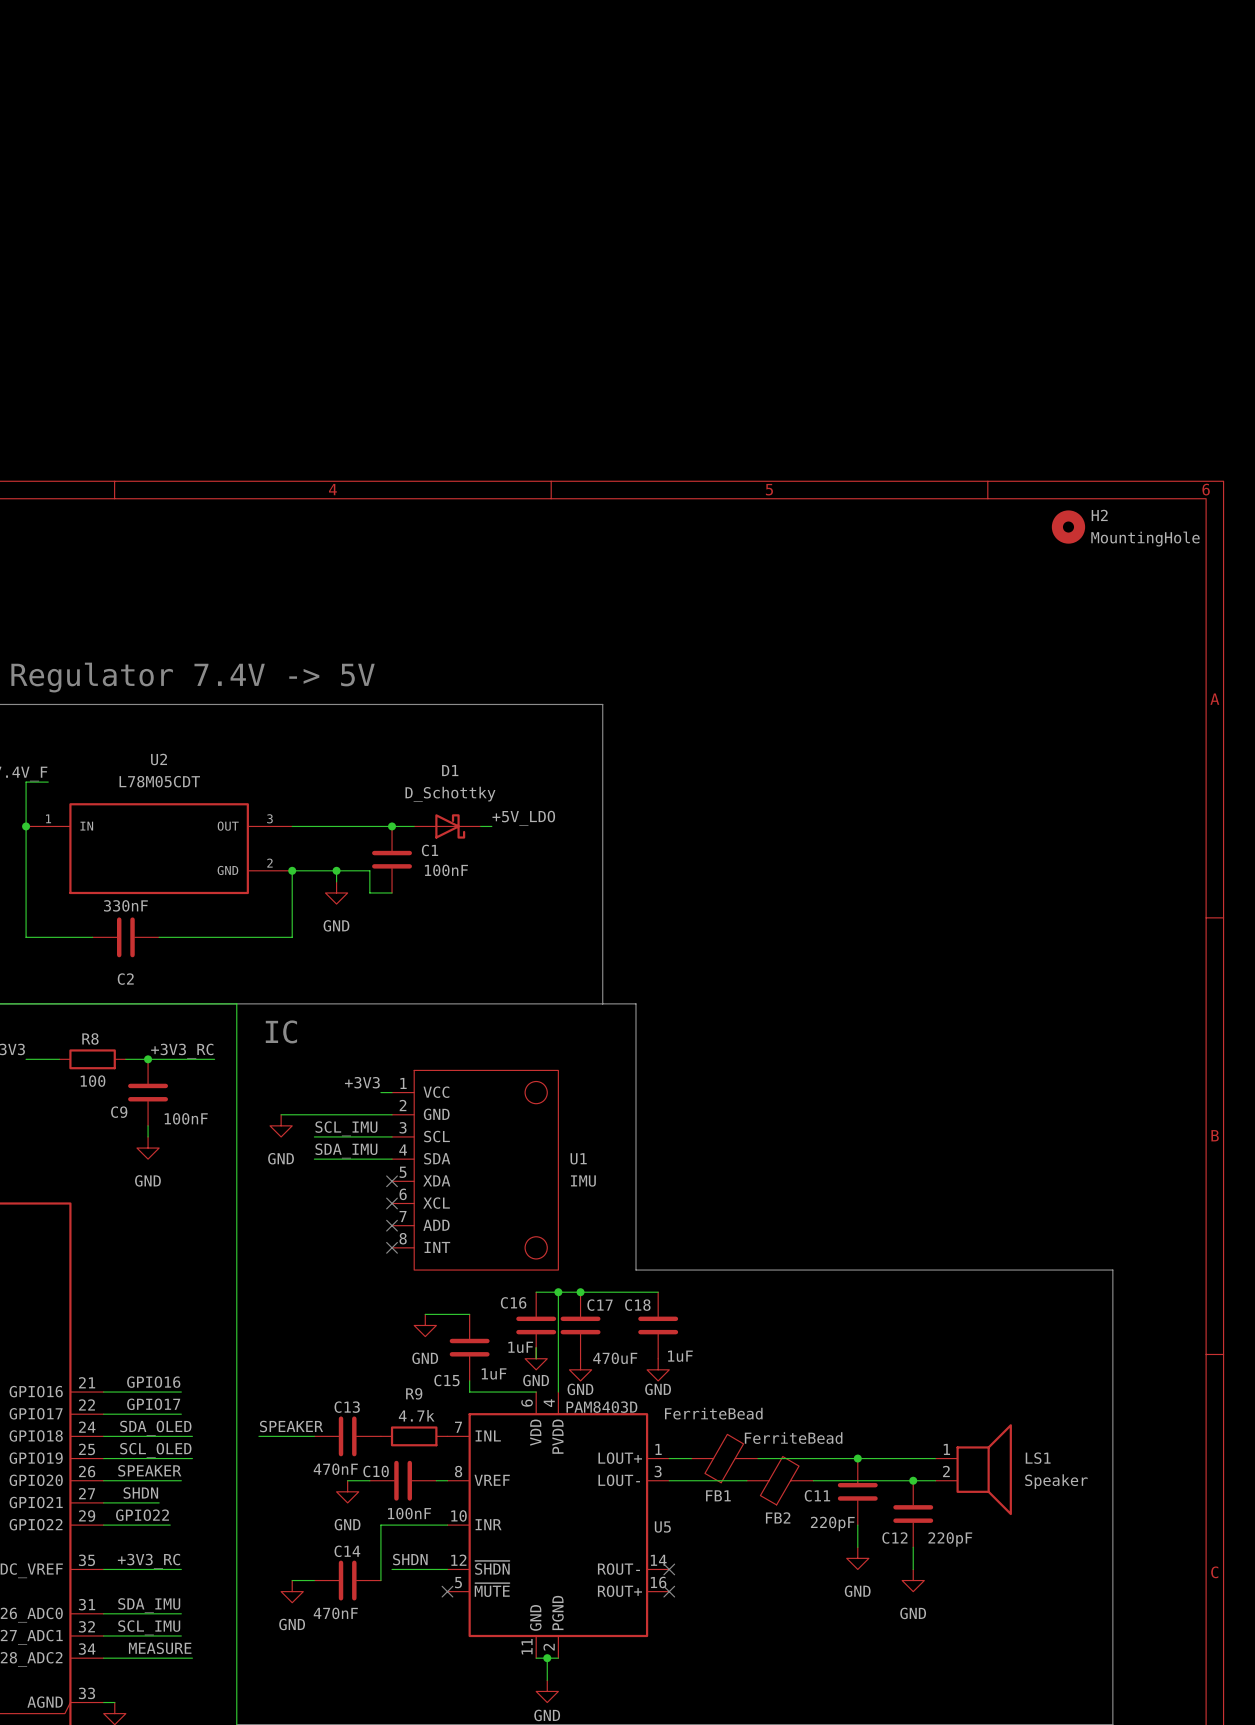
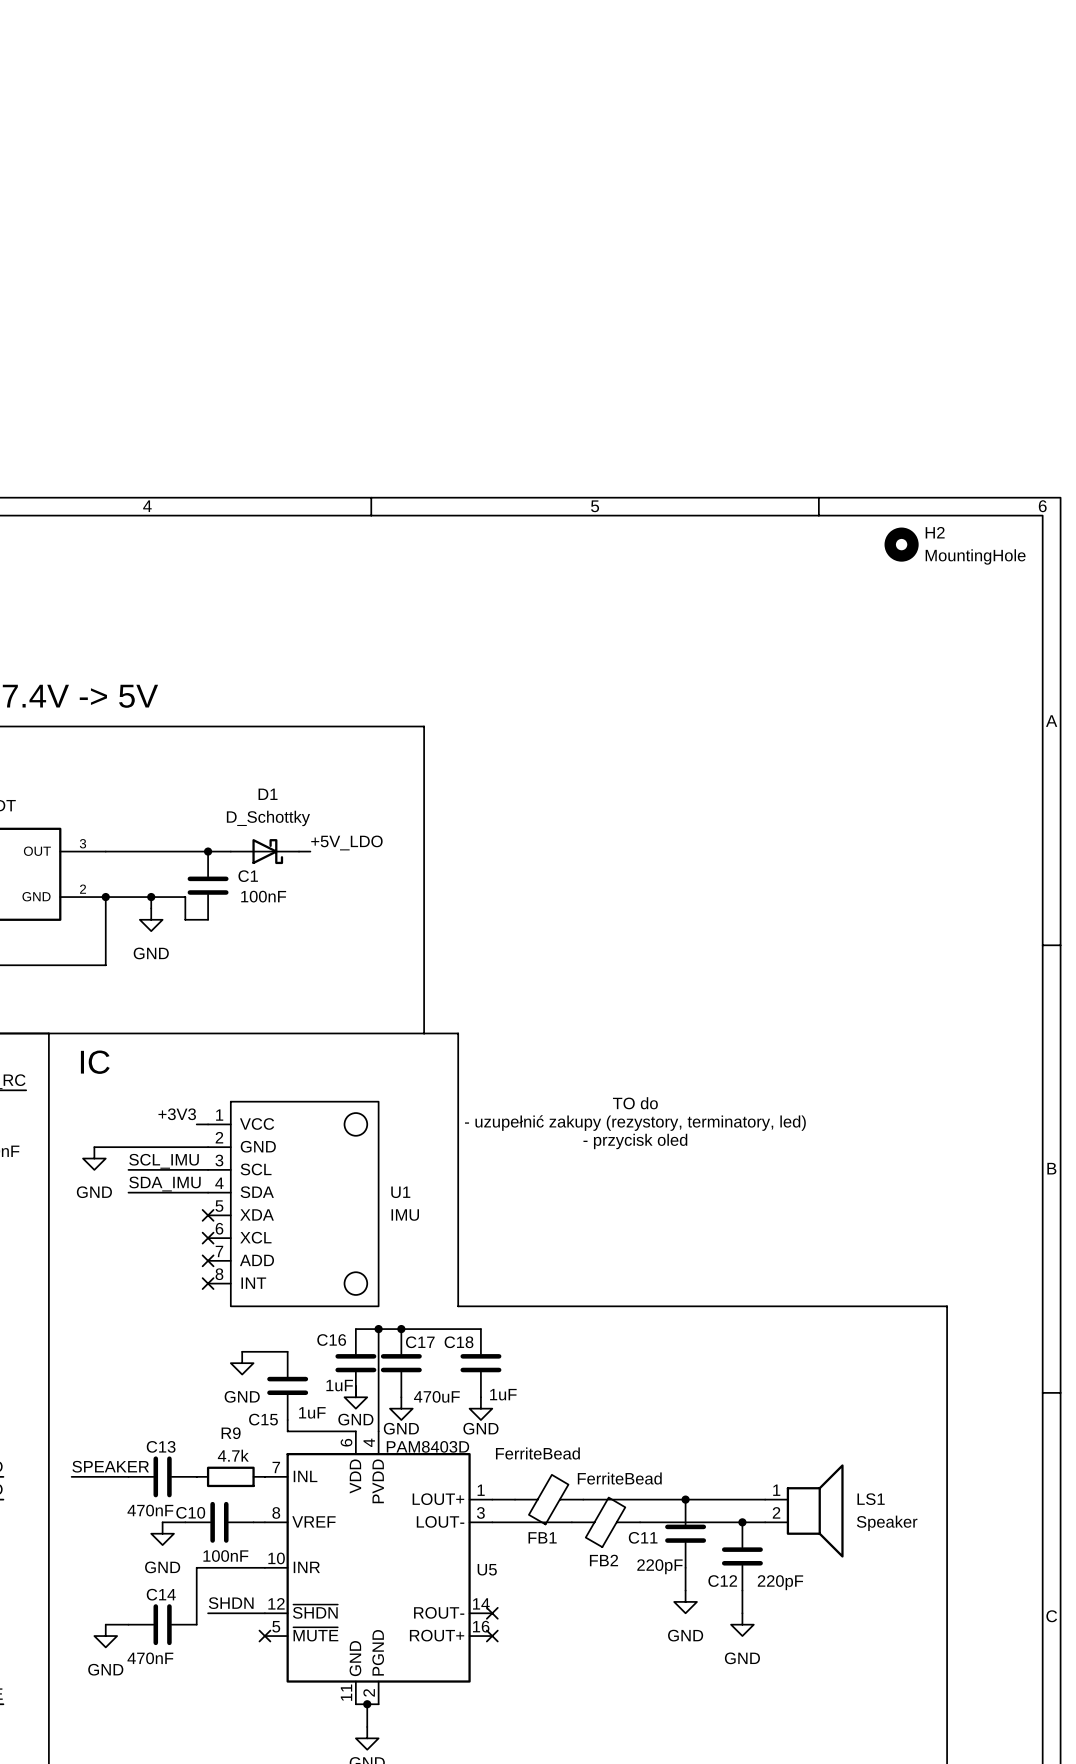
text: none -> TO do (635, 1103)
text: none -> - uzupełnić zakupy (rezystory, terminatory, led) (635, 1123)
text: none -> - przycisk oled (635, 1141)

